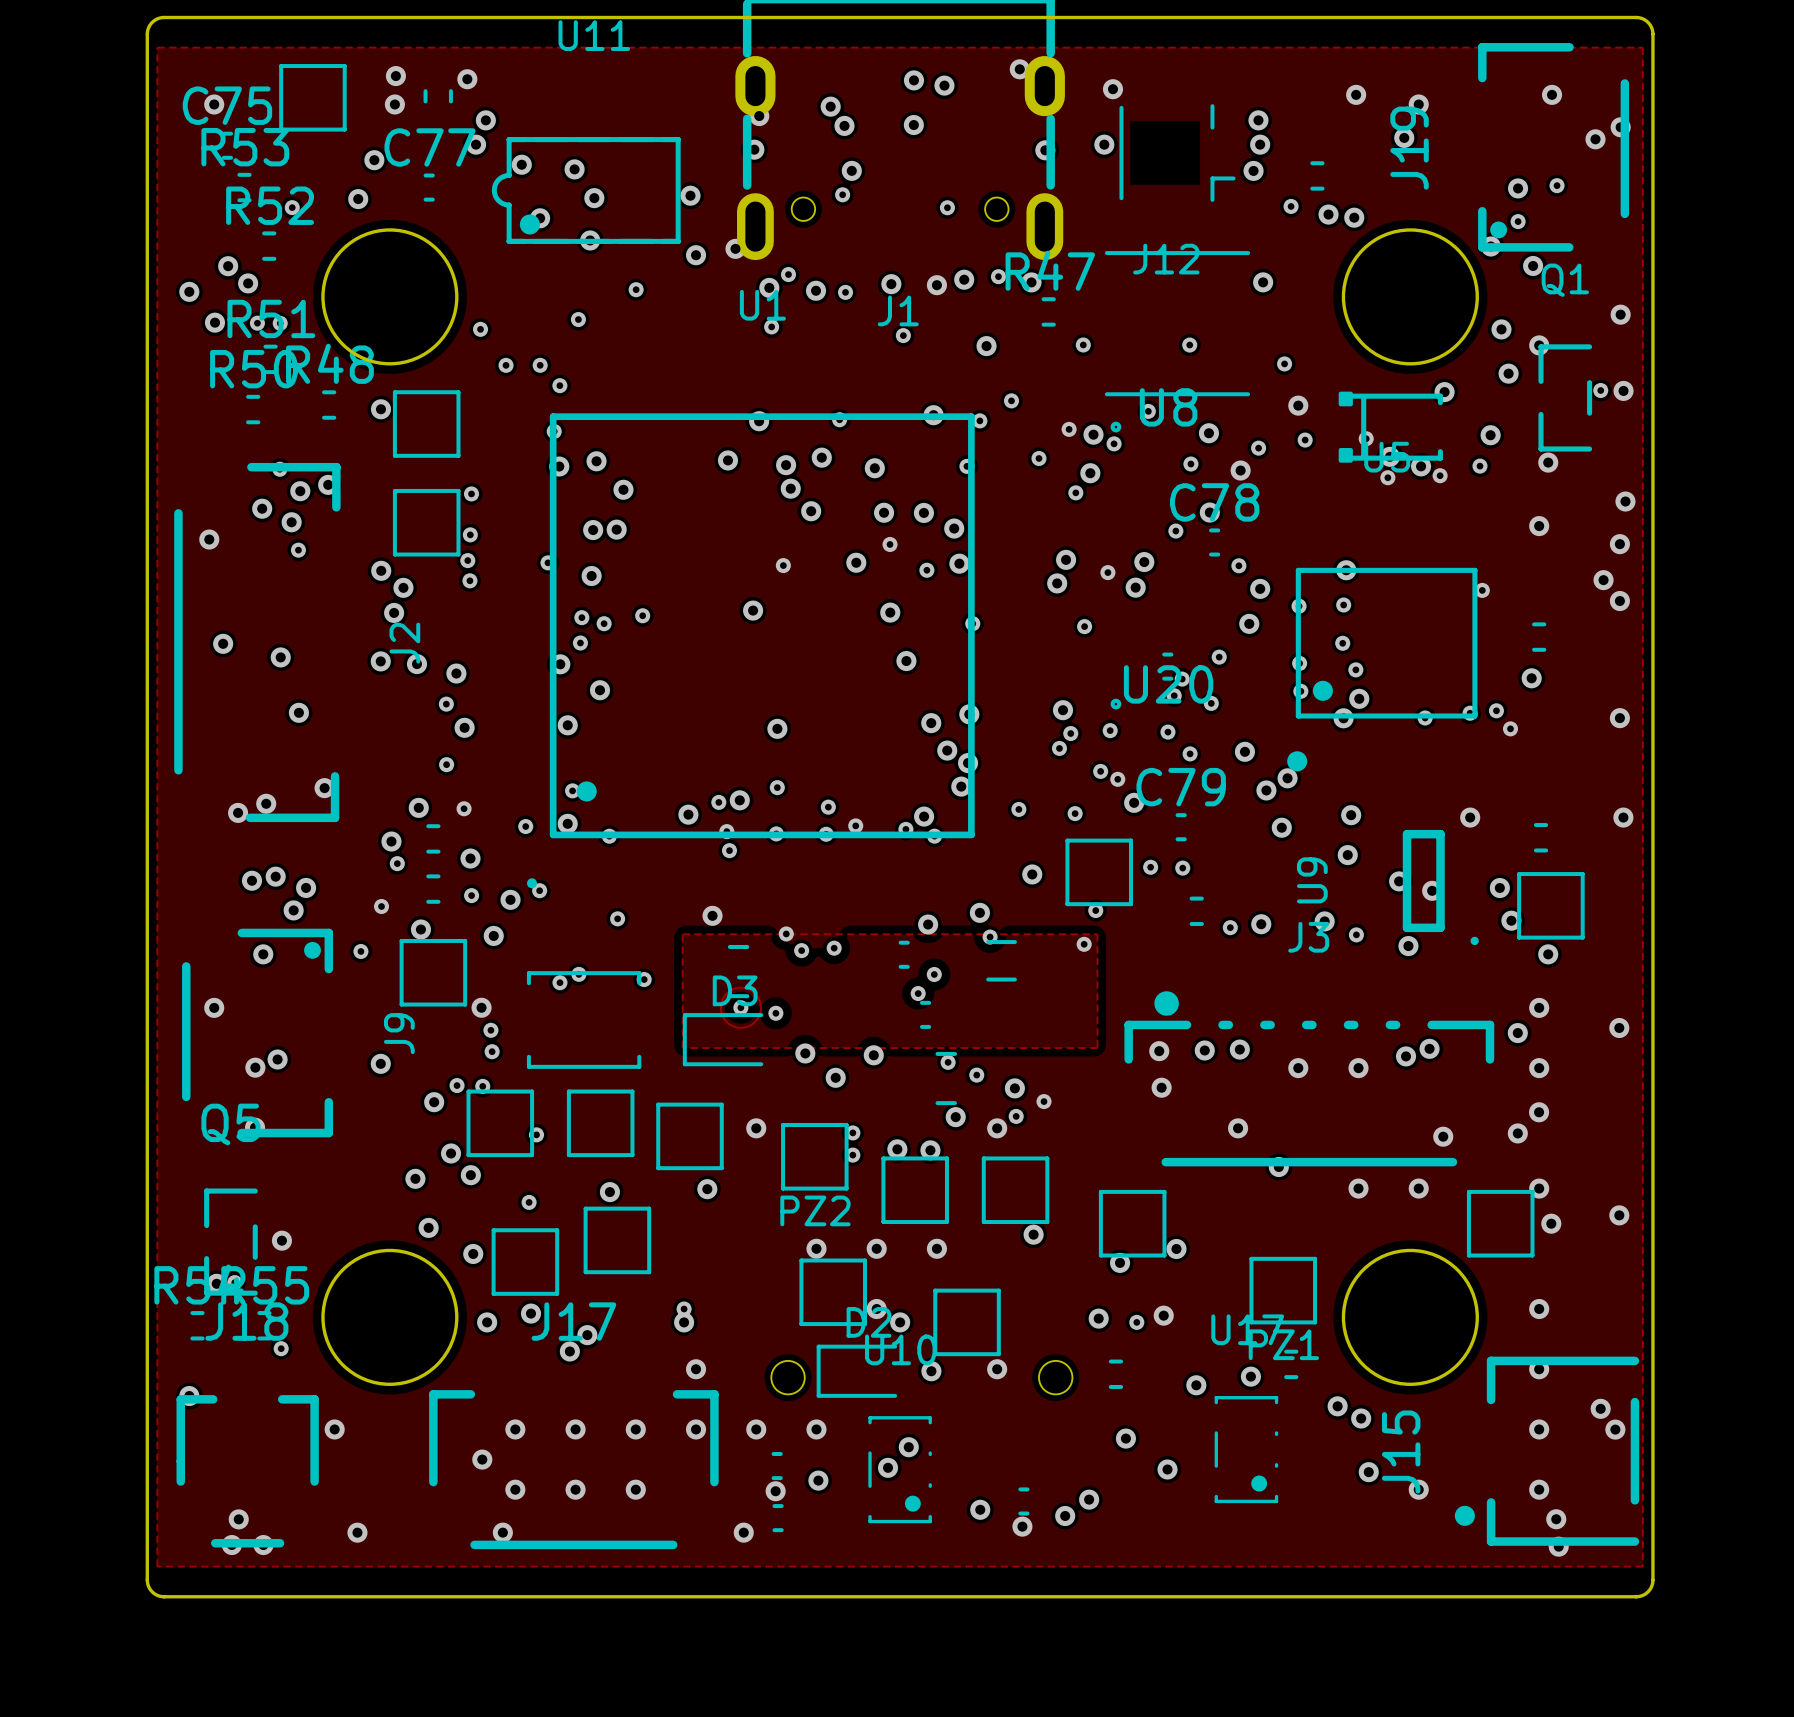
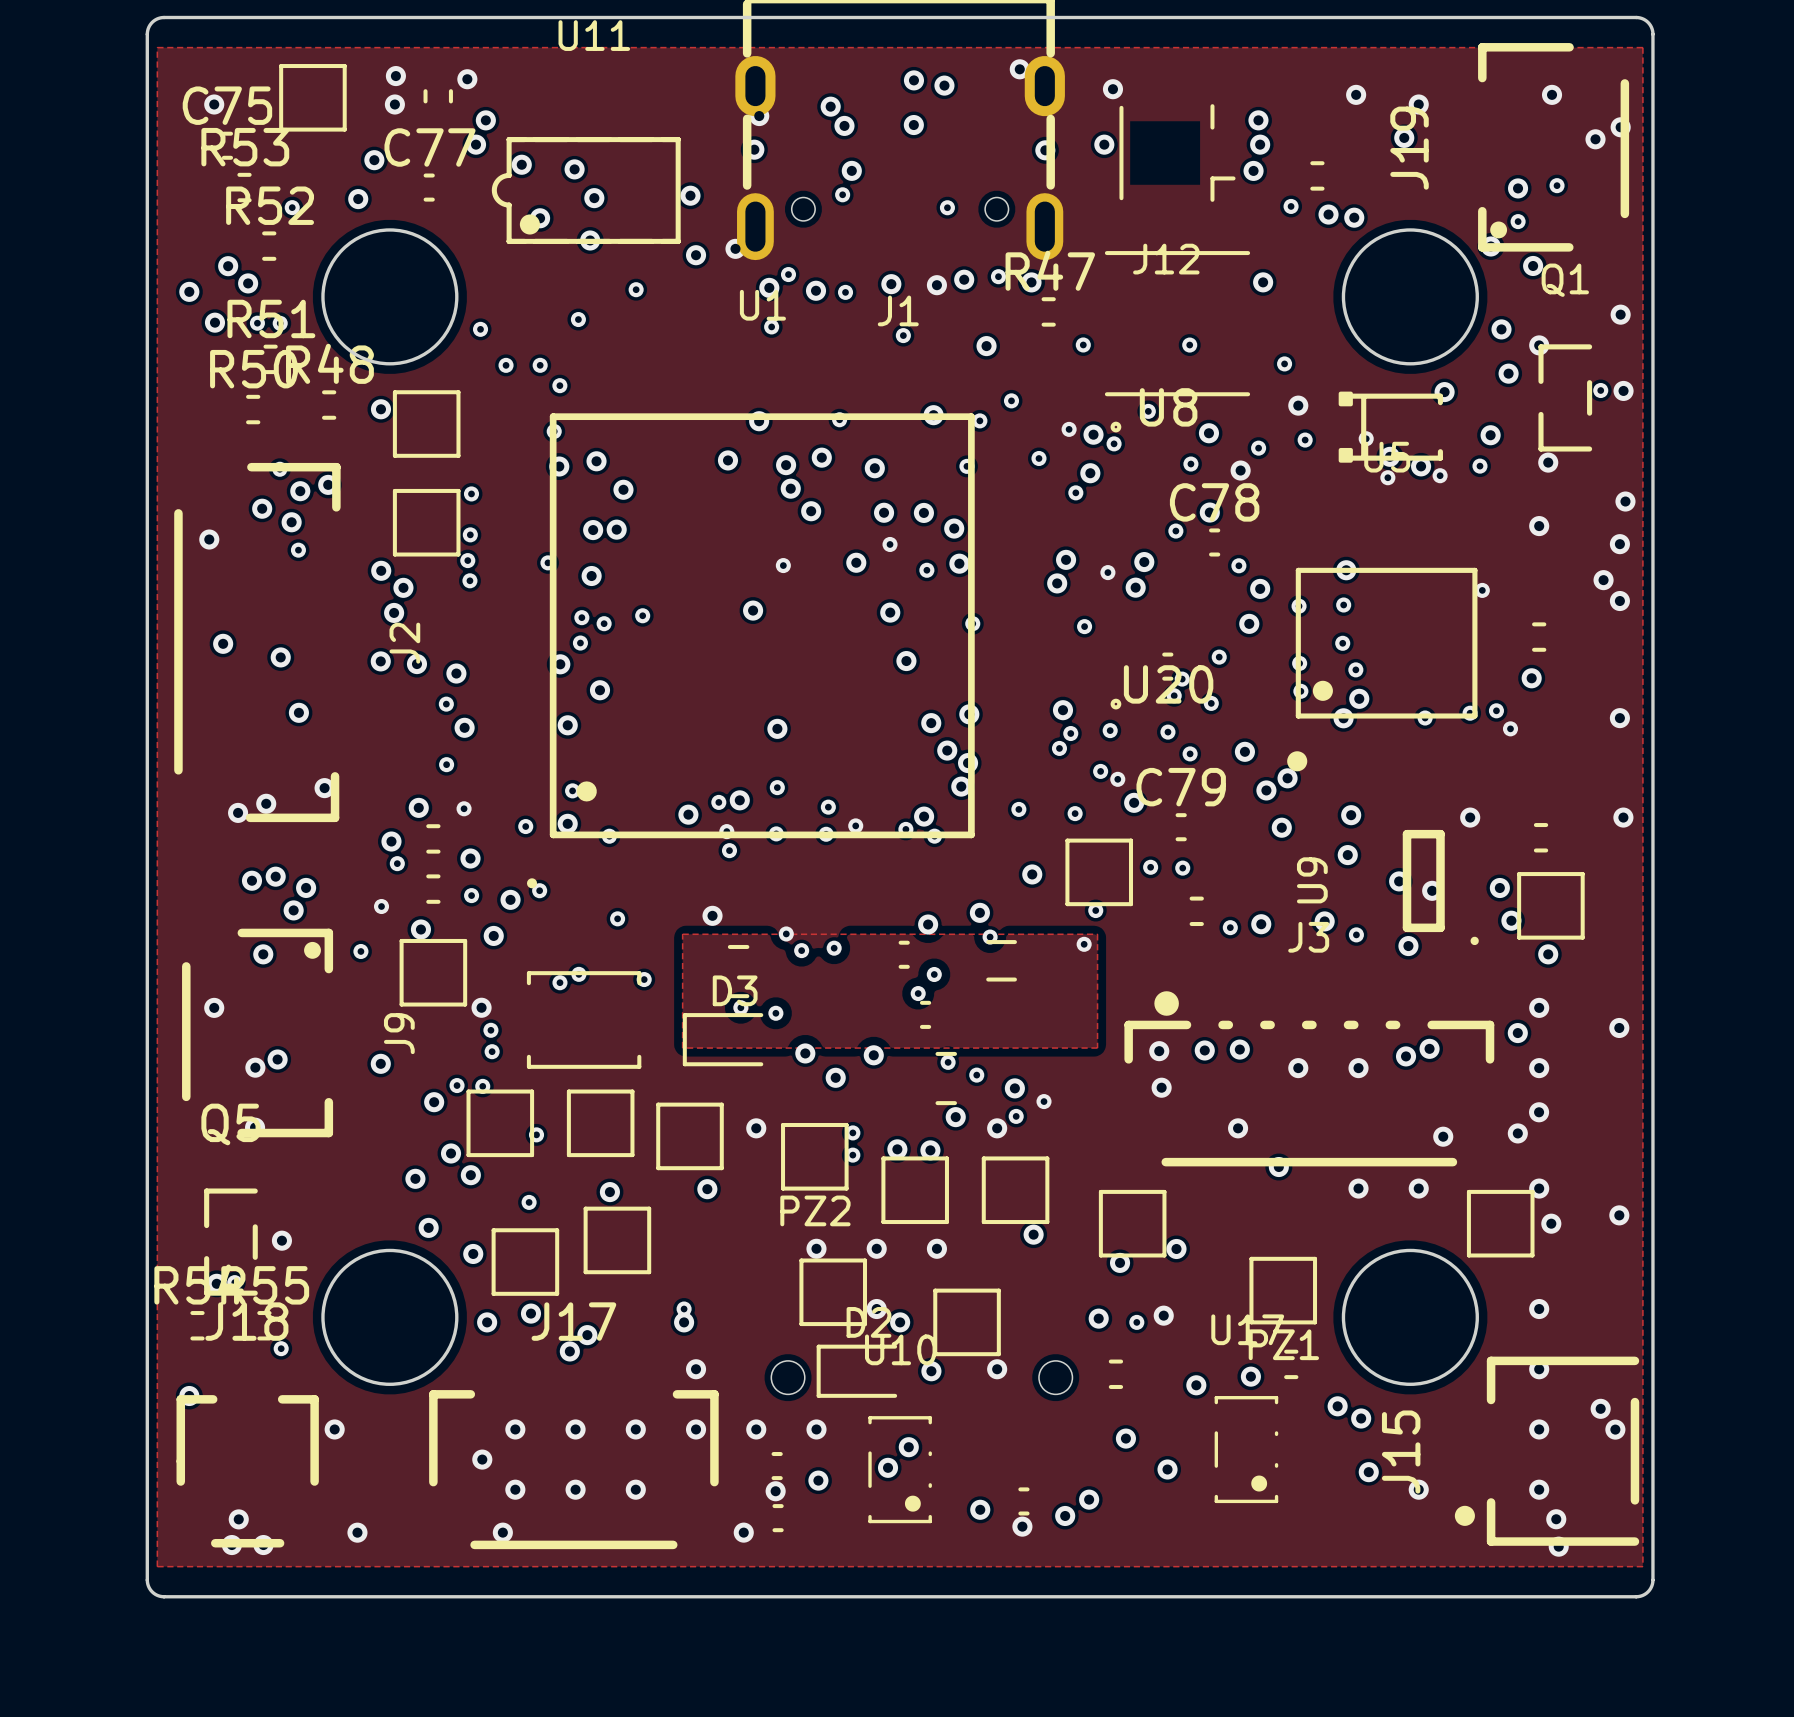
zone outline: (738, 987) (730, 990) (724, 995) (721, 1002) (720, 1010) (723, 1017) (728, 1023) (735, 1027) (743, 1027) (750, 1025) (756, 1019) (760, 1012) (760, 1005) (758, 997) (753, 991) (746, 988) (738, 987) -> none

